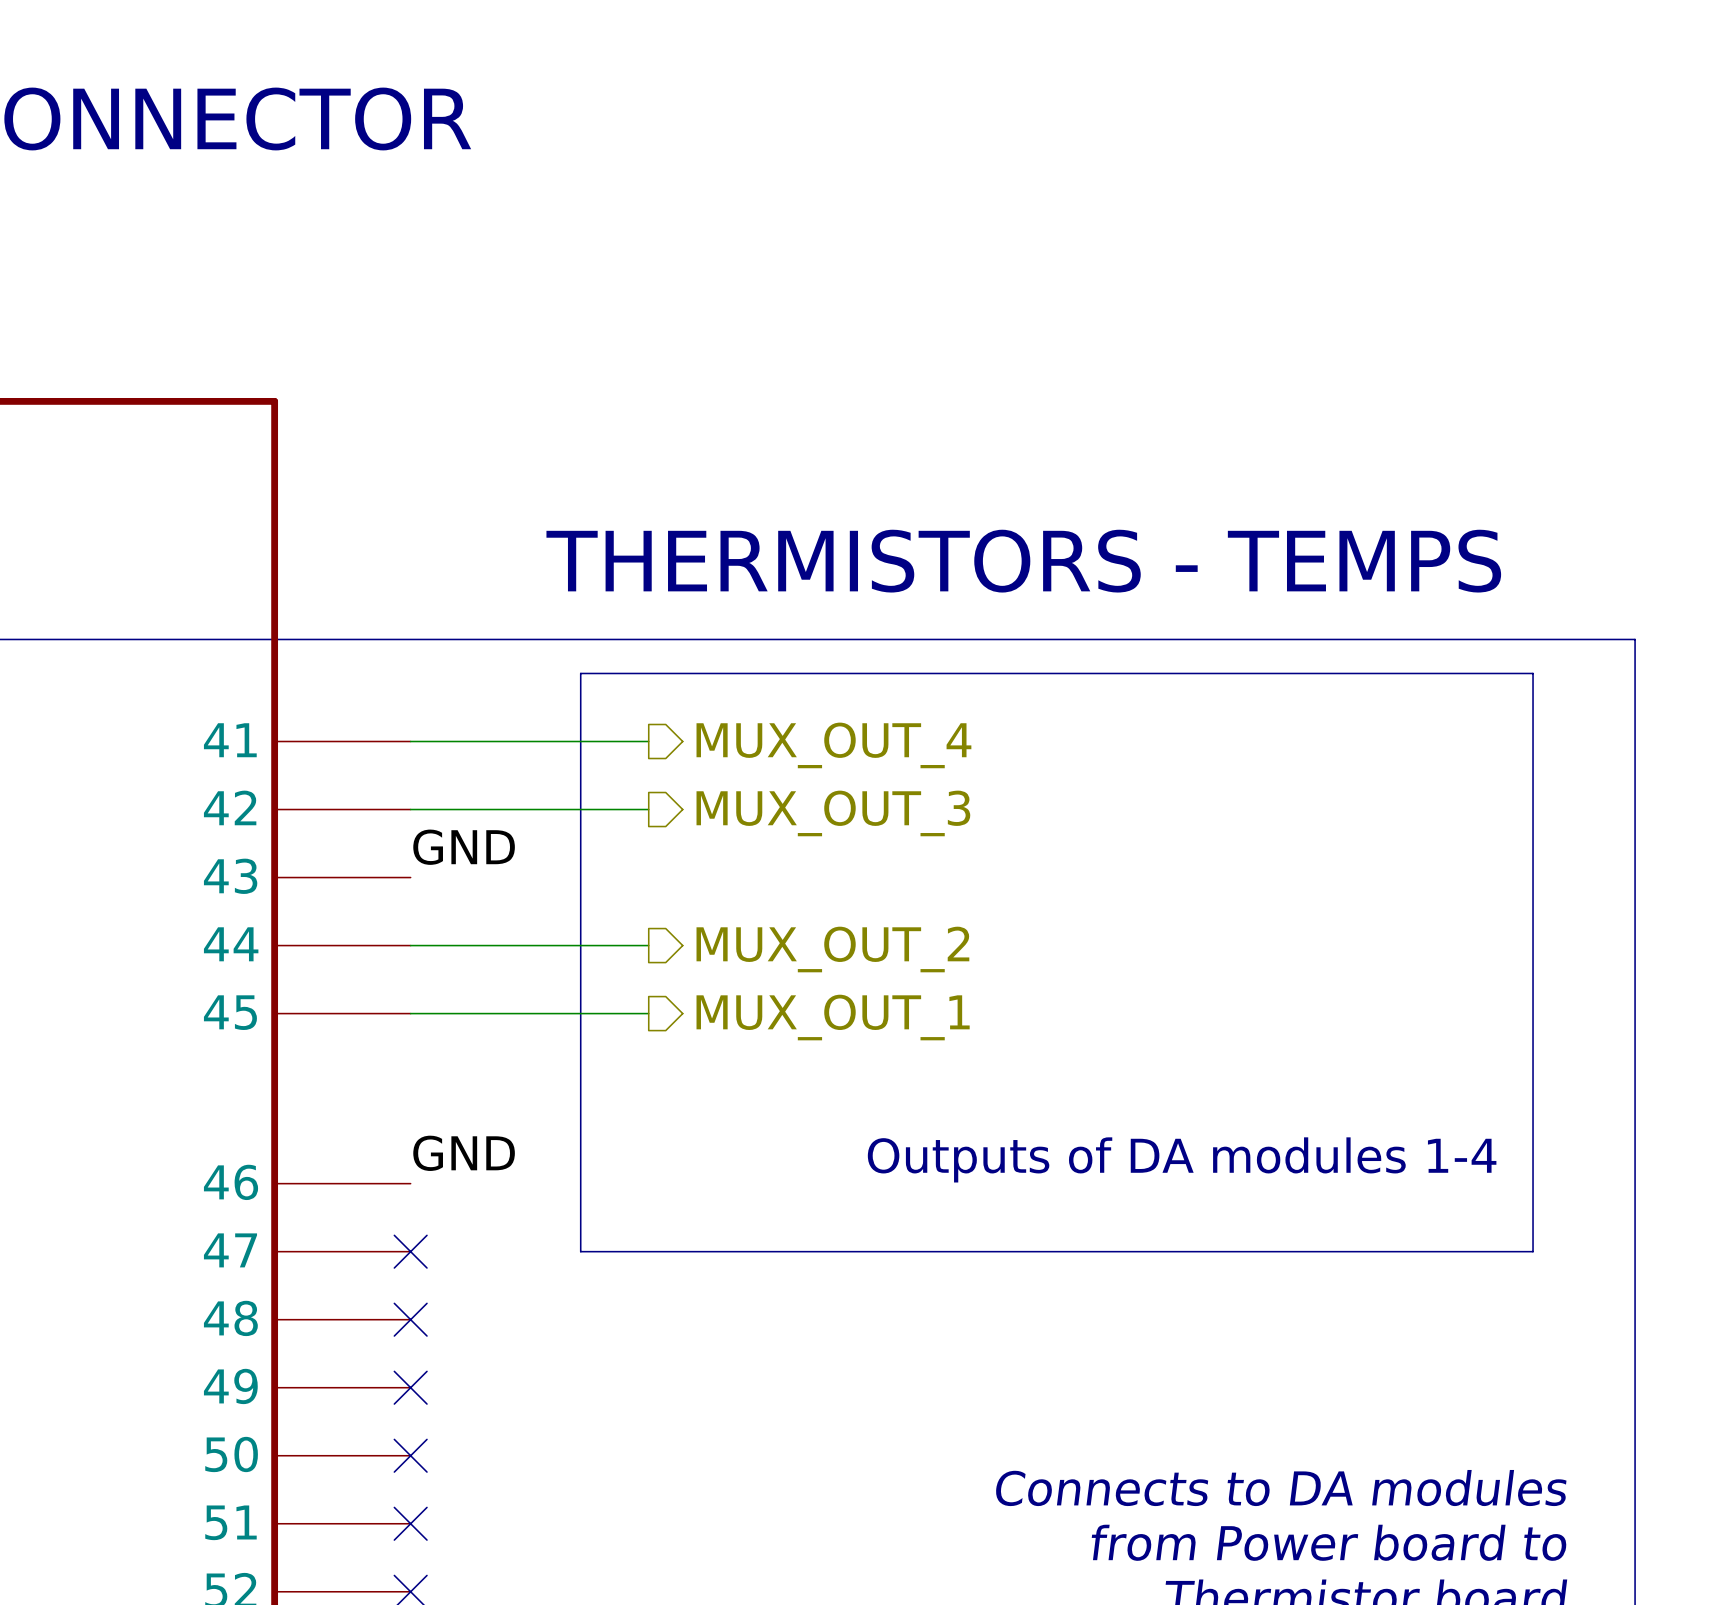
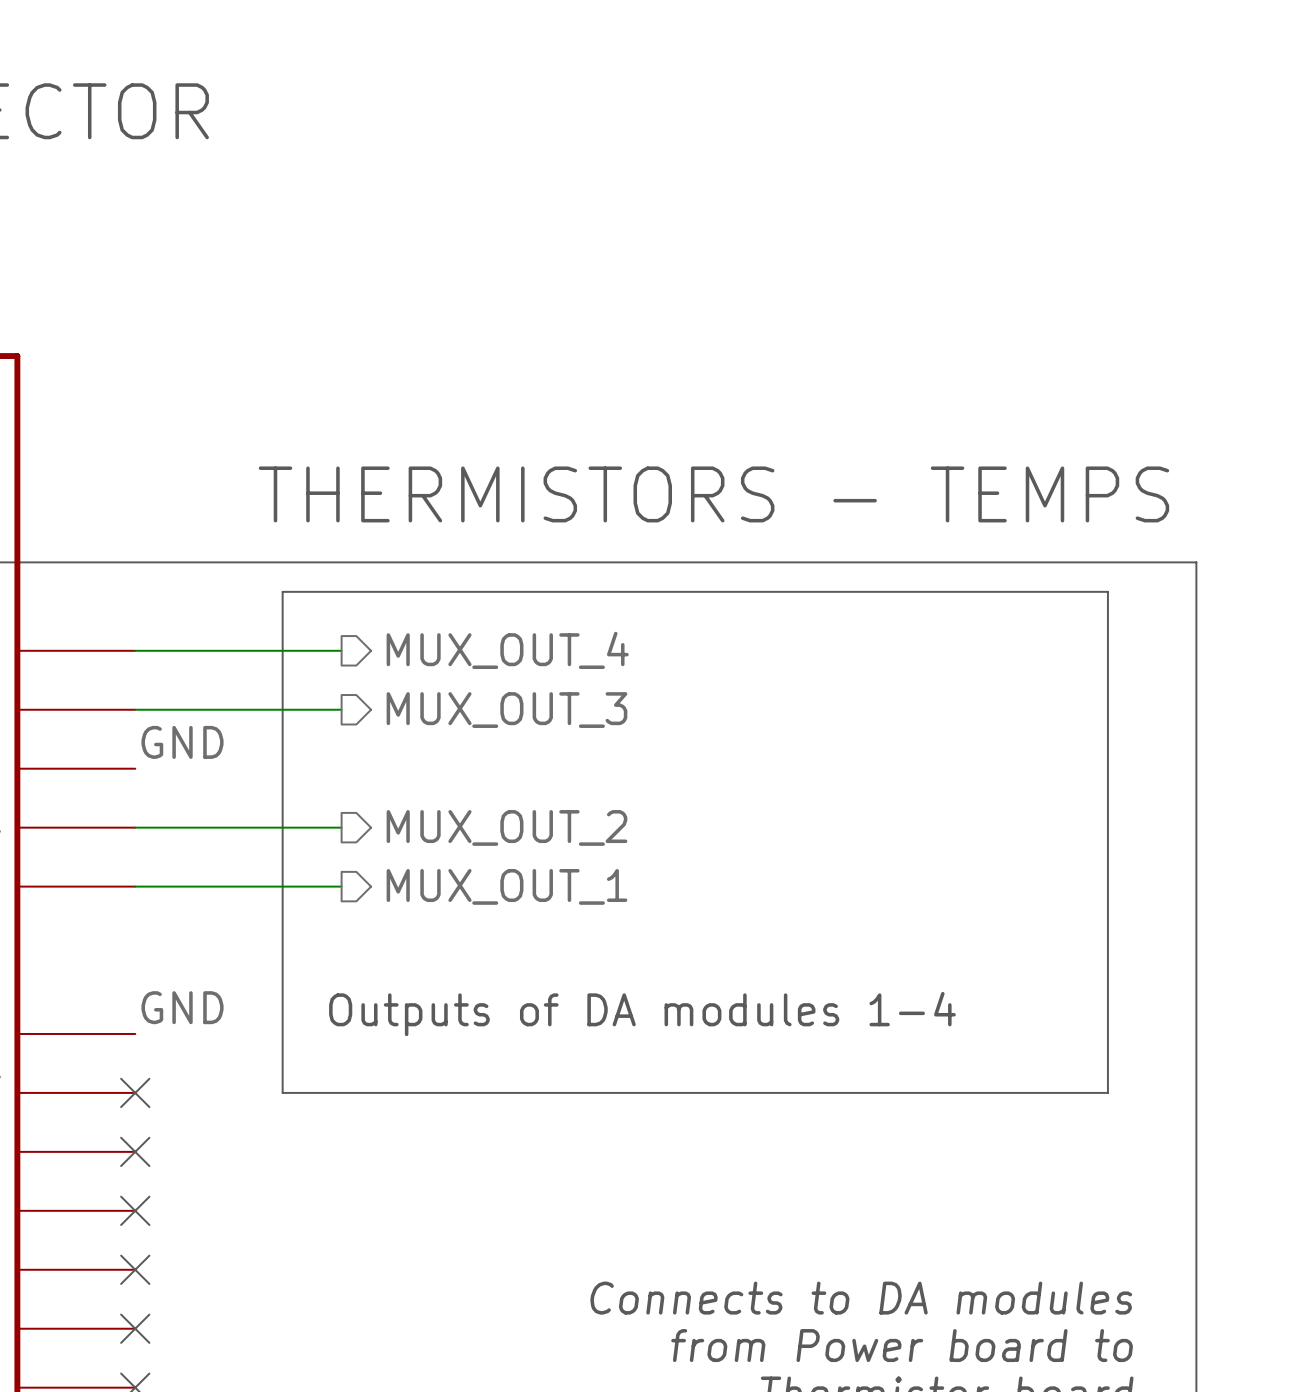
text position: Outputs of DA modules 1-4 (1182, 1159) -> Outputs of DA modules 1-4 (642, 1014)

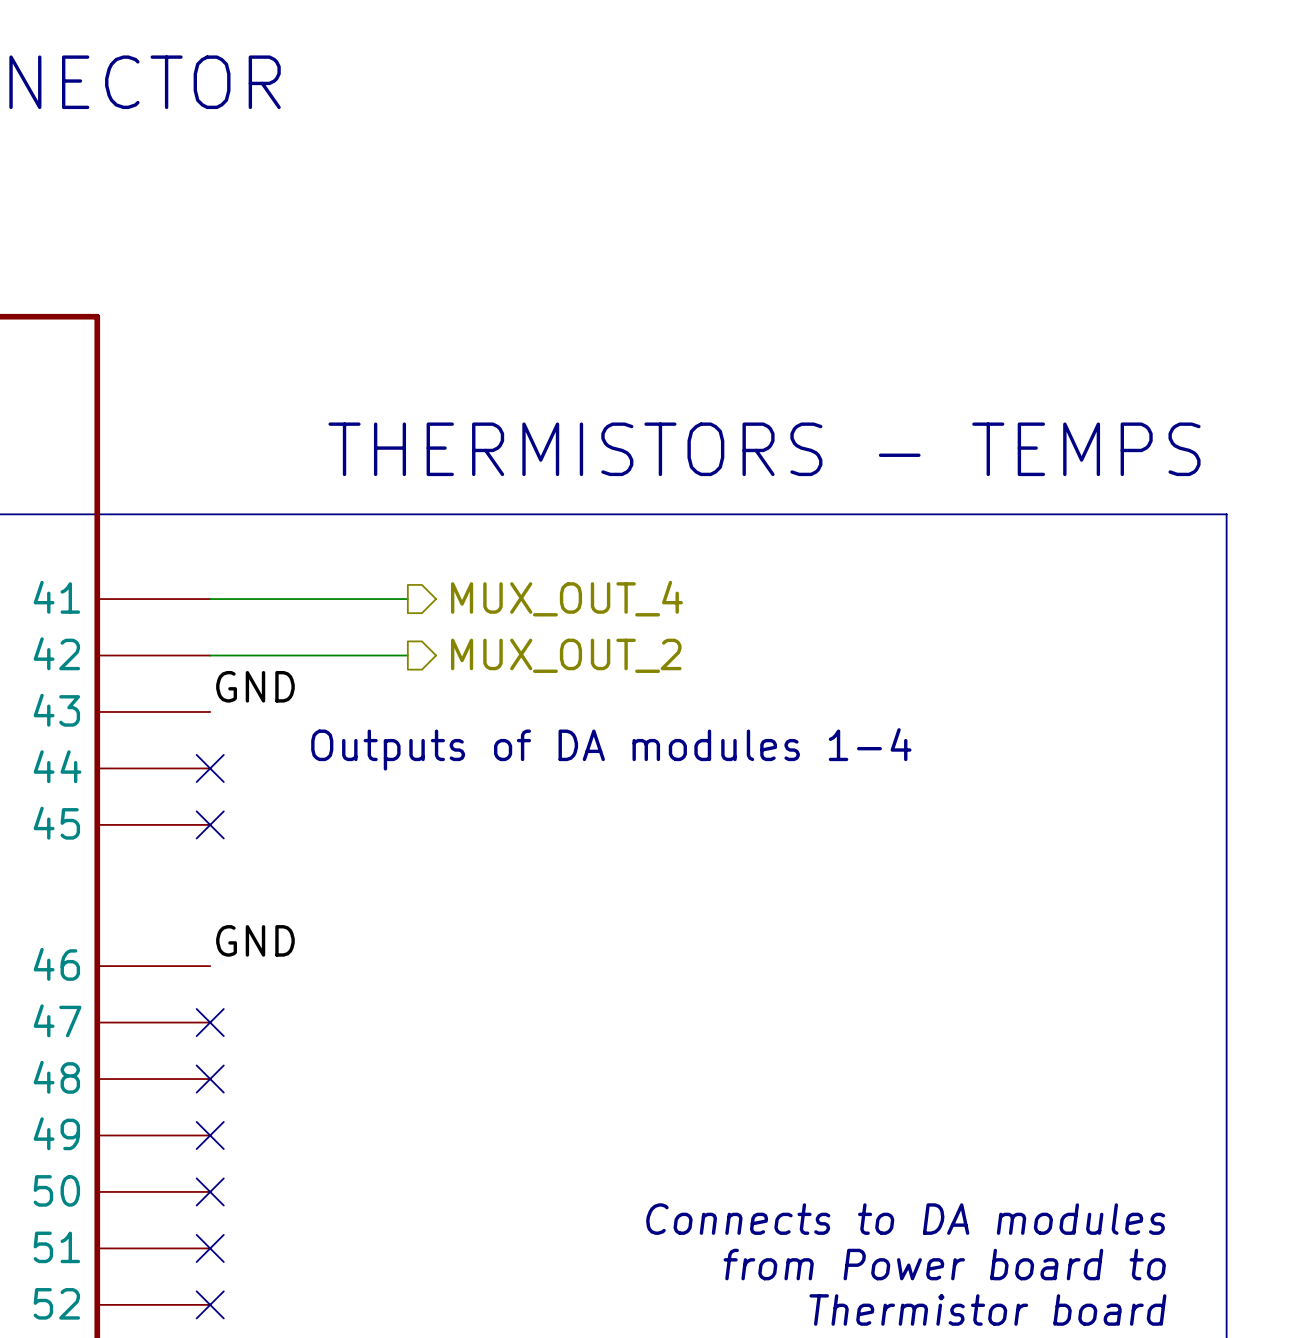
line: (282, 591) (1107, 591) (1107, 1092) (282, 1092) (282, 591) -> none
hierarchical label: MUX_OUT_3 (506, 710) -> MUX_OUT_2 (566, 655)
wire: (135, 827) (341, 827) -> none
no-connect mark: none -> (210, 768)
hierarchical label: MUX_OUT_2 (506, 827) -> none
wire: (135, 886) (341, 886) -> none
no-connect mark: none -> (210, 824)
hierarchical label: MUX_OUT_1 (506, 886) -> none
text position: Outputs of DA modules 1-4 (642, 1014) -> Outputs of DA modules 1-4 (611, 749)

